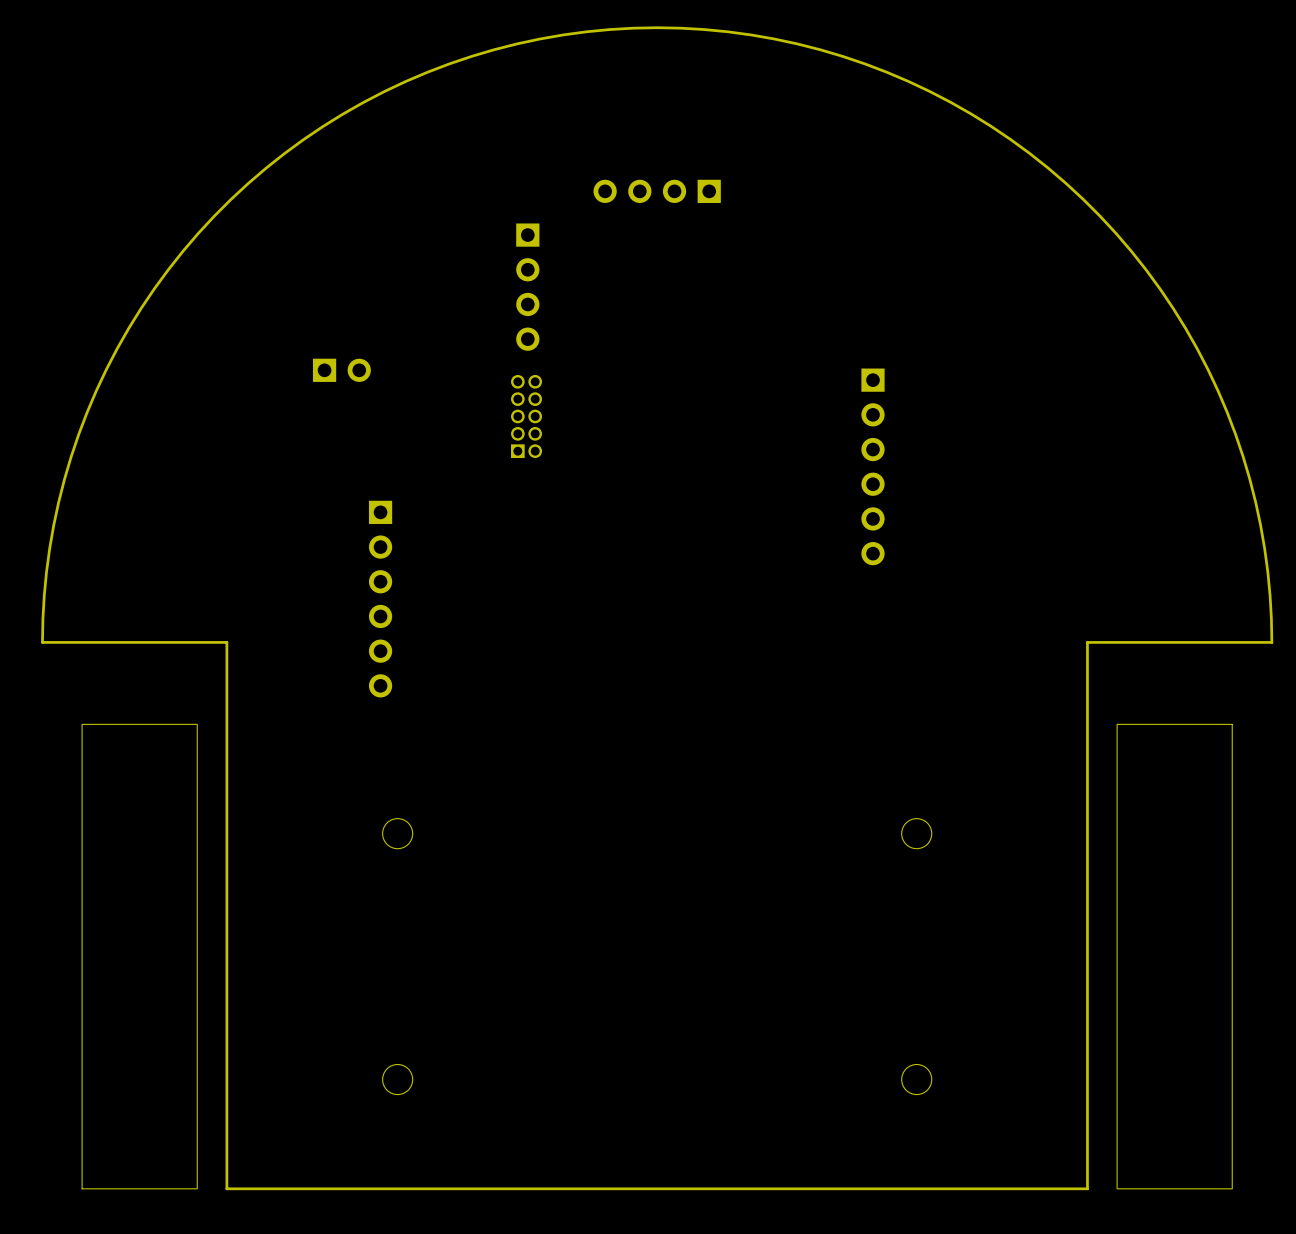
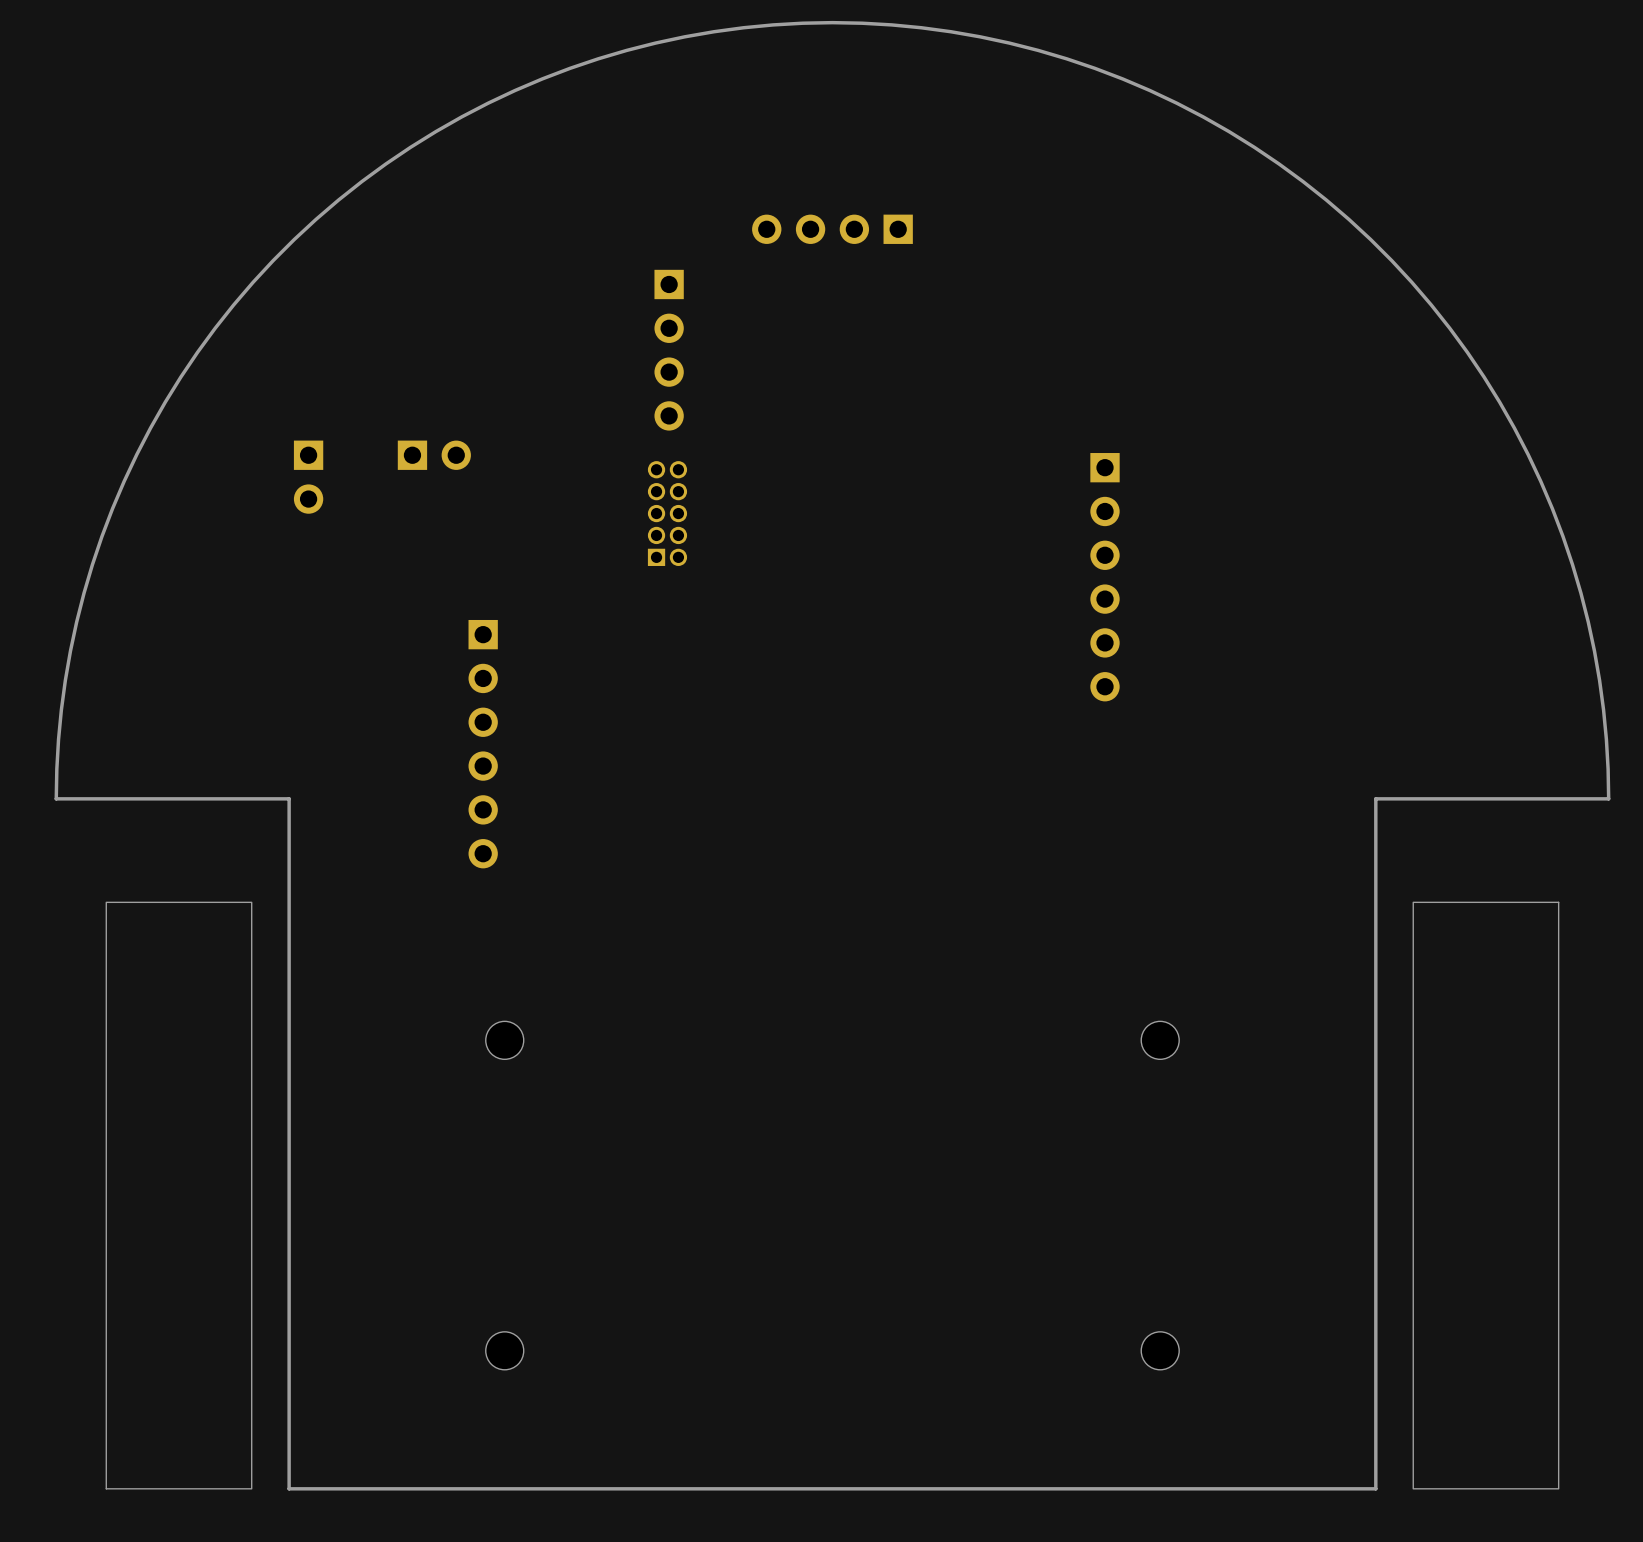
part: none -> (308, 477)

